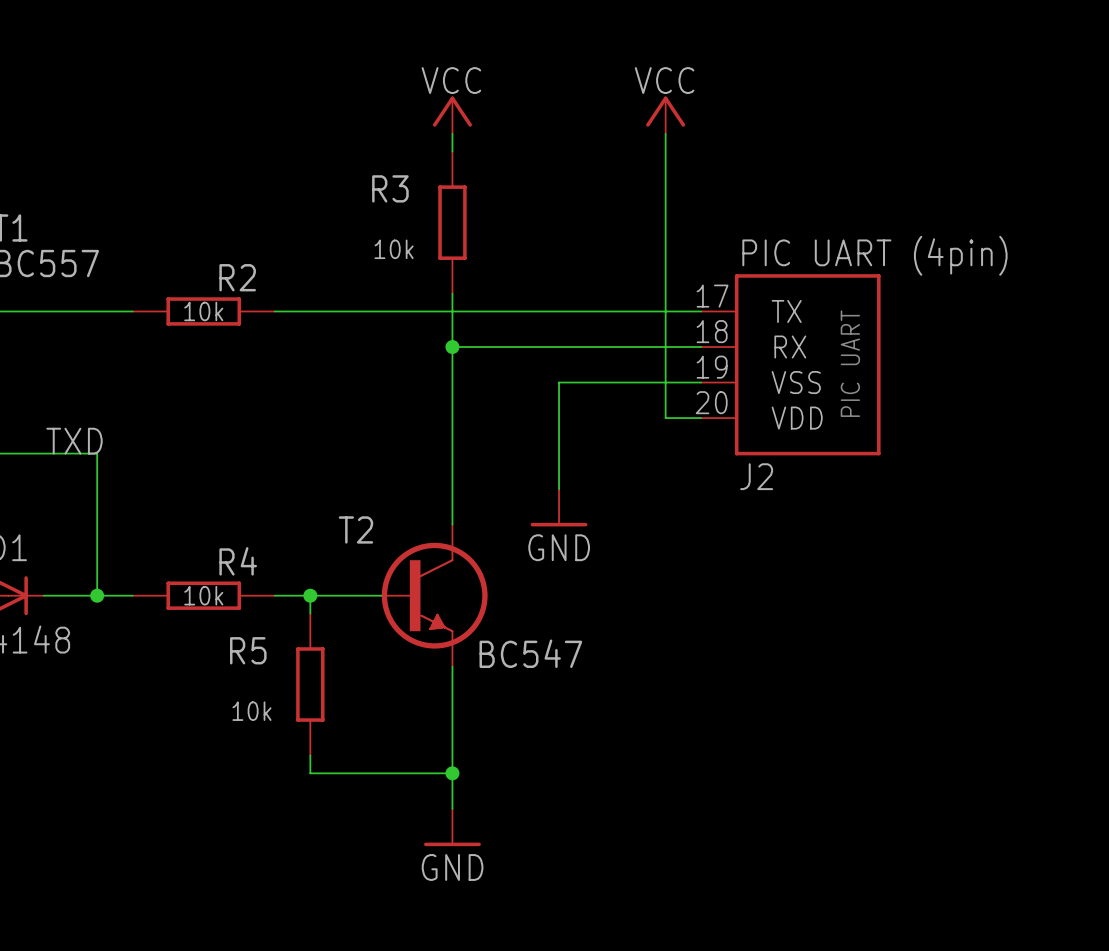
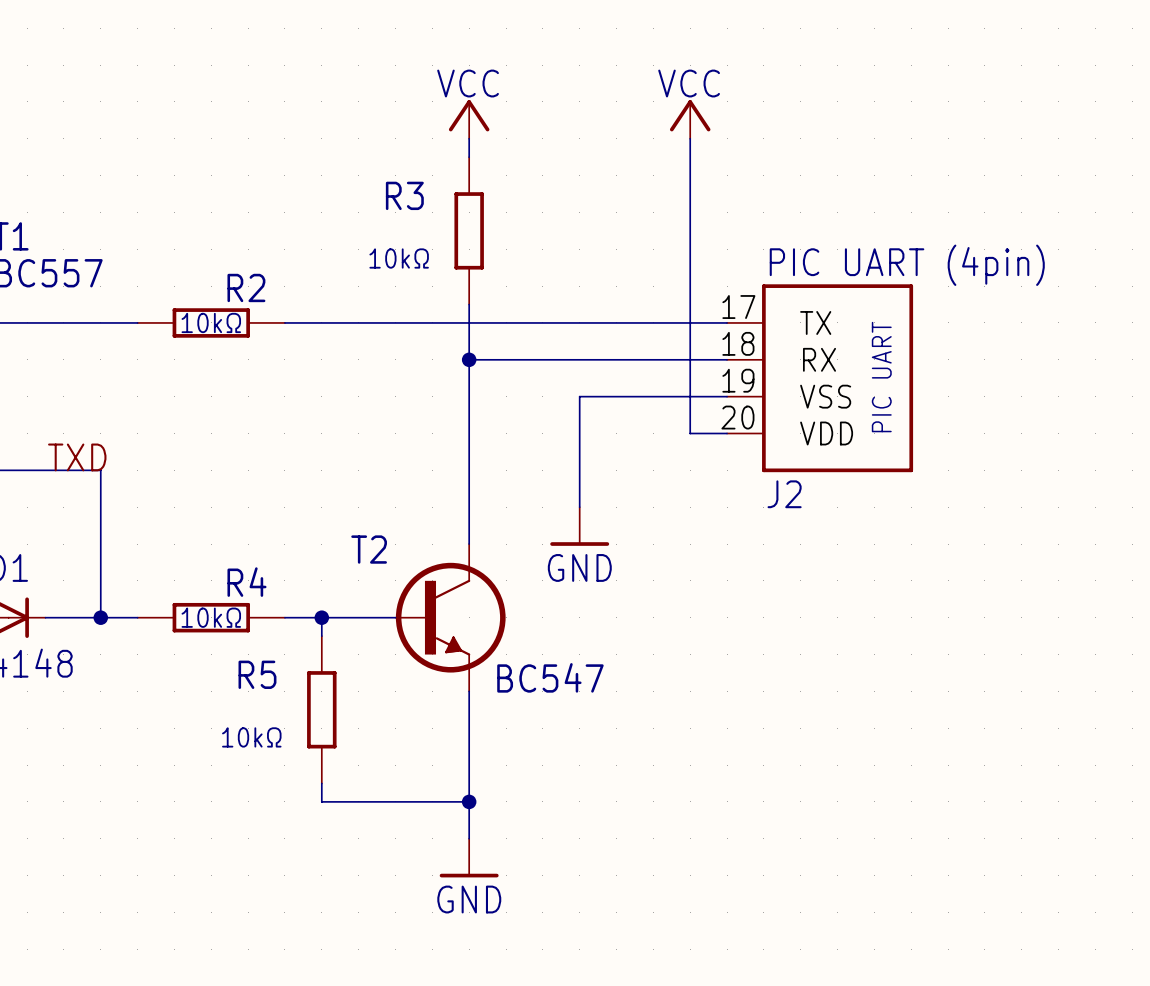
R3 value: 10k (394, 249) -> 10kΩ (399, 258)
R2 value: 10k (203, 311) -> 10kΩ (211, 322)
R4 value: 10k (203, 595) -> 10kΩ (211, 617)
R5 value: 10k (251, 711) -> 10kΩ (251, 737)

